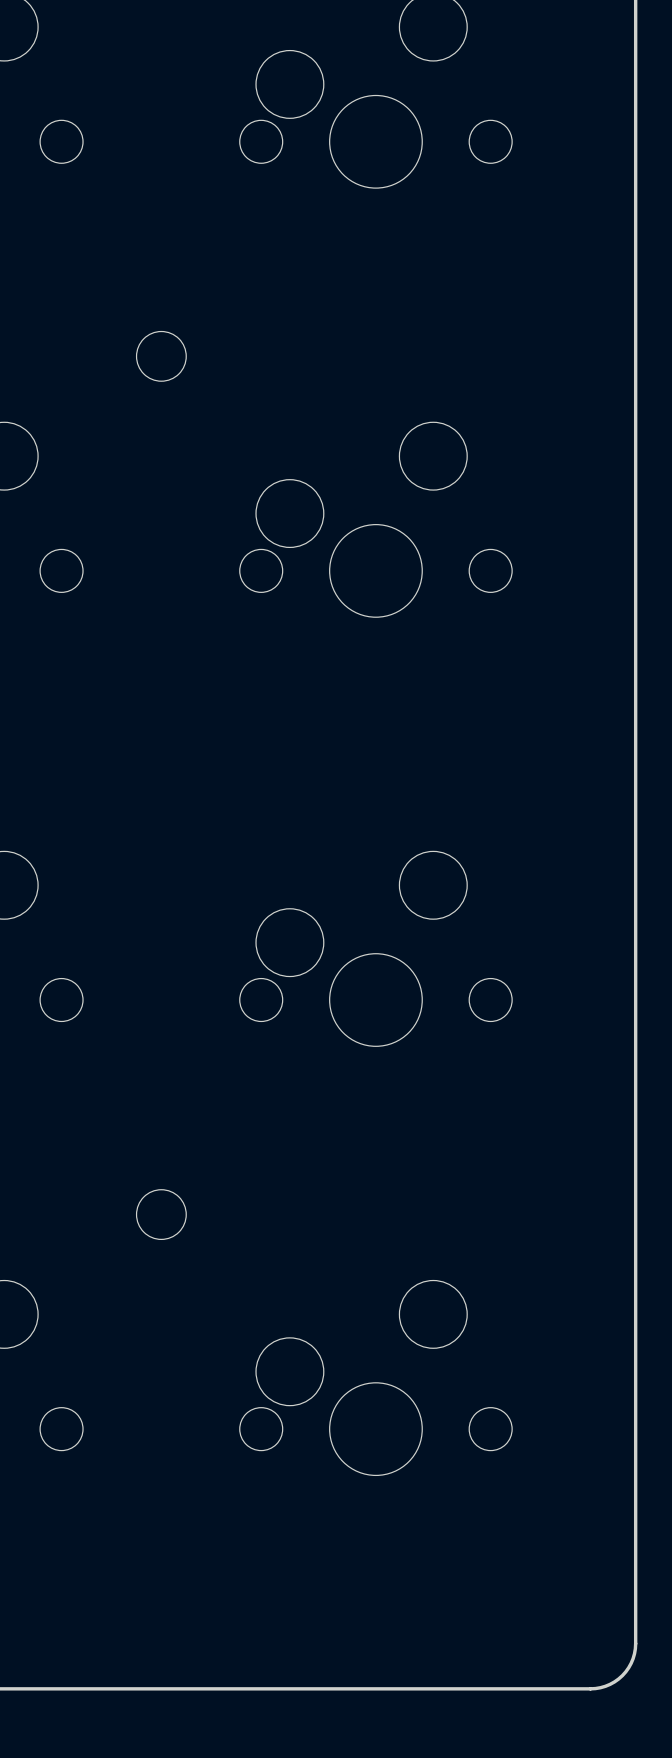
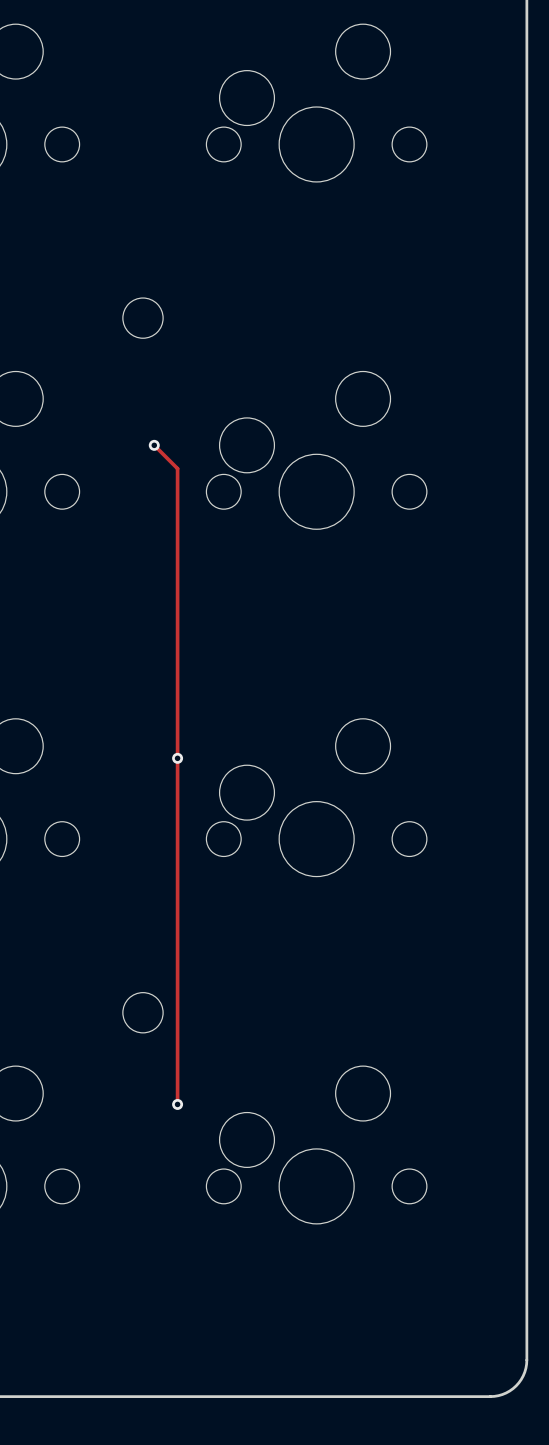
track: none -> (154, 445) (177, 468) (177, 1104)
via: none -> (154, 445)
via: none -> (177, 758)
via: none -> (177, 1104)

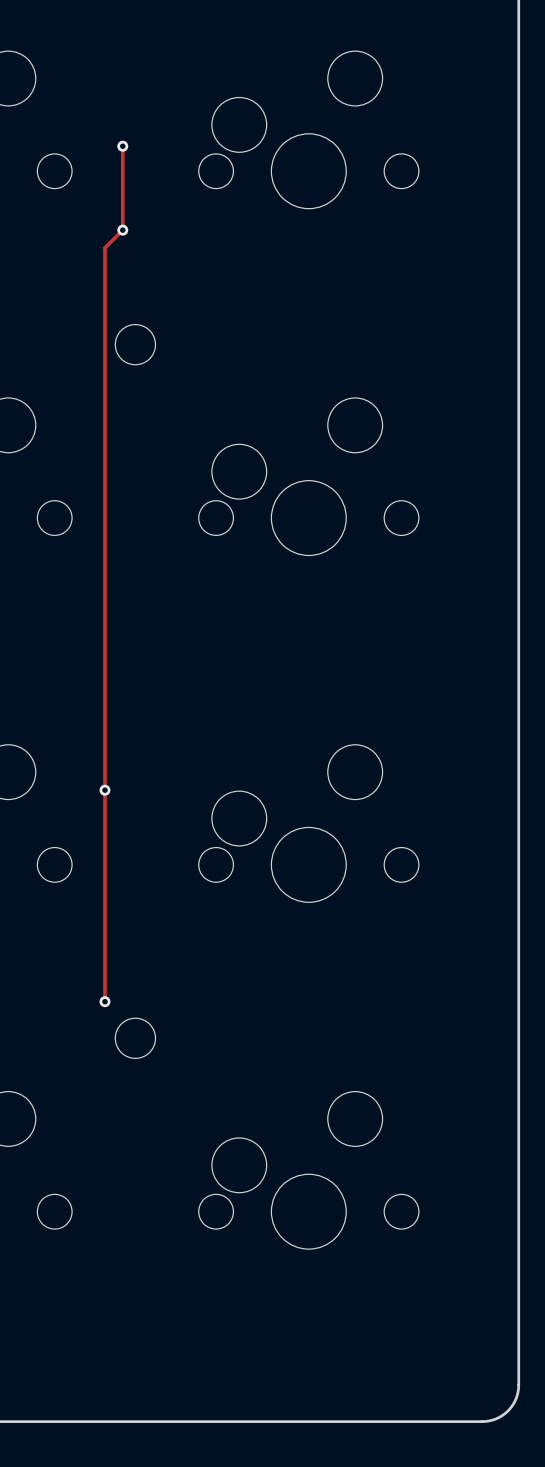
track: none -> (122, 146) (122, 230) (104, 247) (104, 1001)
via: none -> (122, 146)
via: none -> (122, 230)
track: (154, 445) (177, 468) (177, 1104) -> none
via: (154, 445) -> none
via position: (177, 758) -> (104, 790)
via: none -> (104, 1001)
via: (177, 1104) -> none

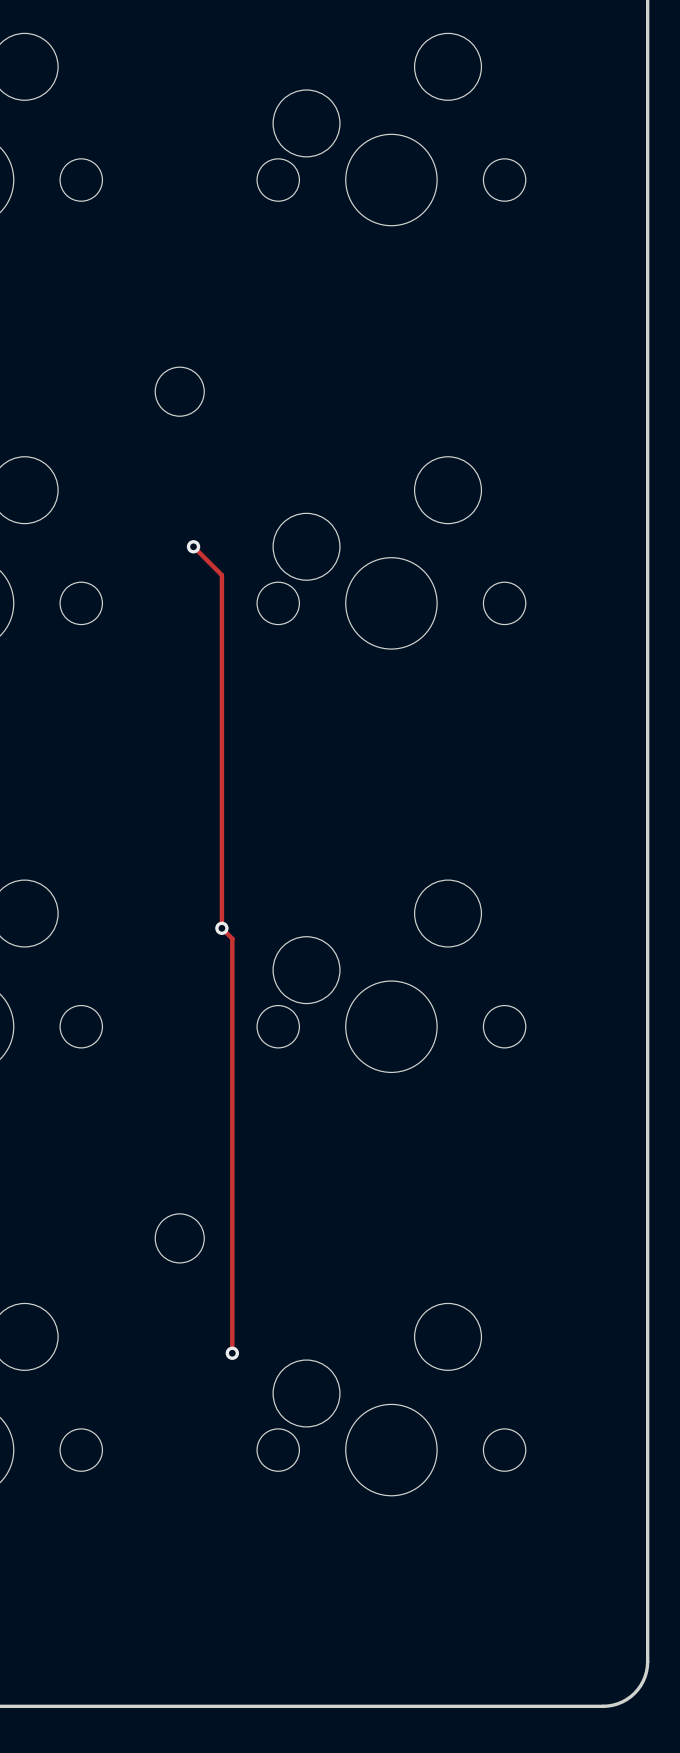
track: (122, 146) (122, 230) (104, 247) (104, 1001) -> none
via: (122, 146) -> none
via: (122, 230) -> none
track: none -> (193, 546) (221, 575) (221, 928) (232, 938) (232, 1353)
via: none -> (193, 546)
via position: (104, 790) -> (221, 928)
via: (104, 1001) -> none
via: none -> (232, 1353)

